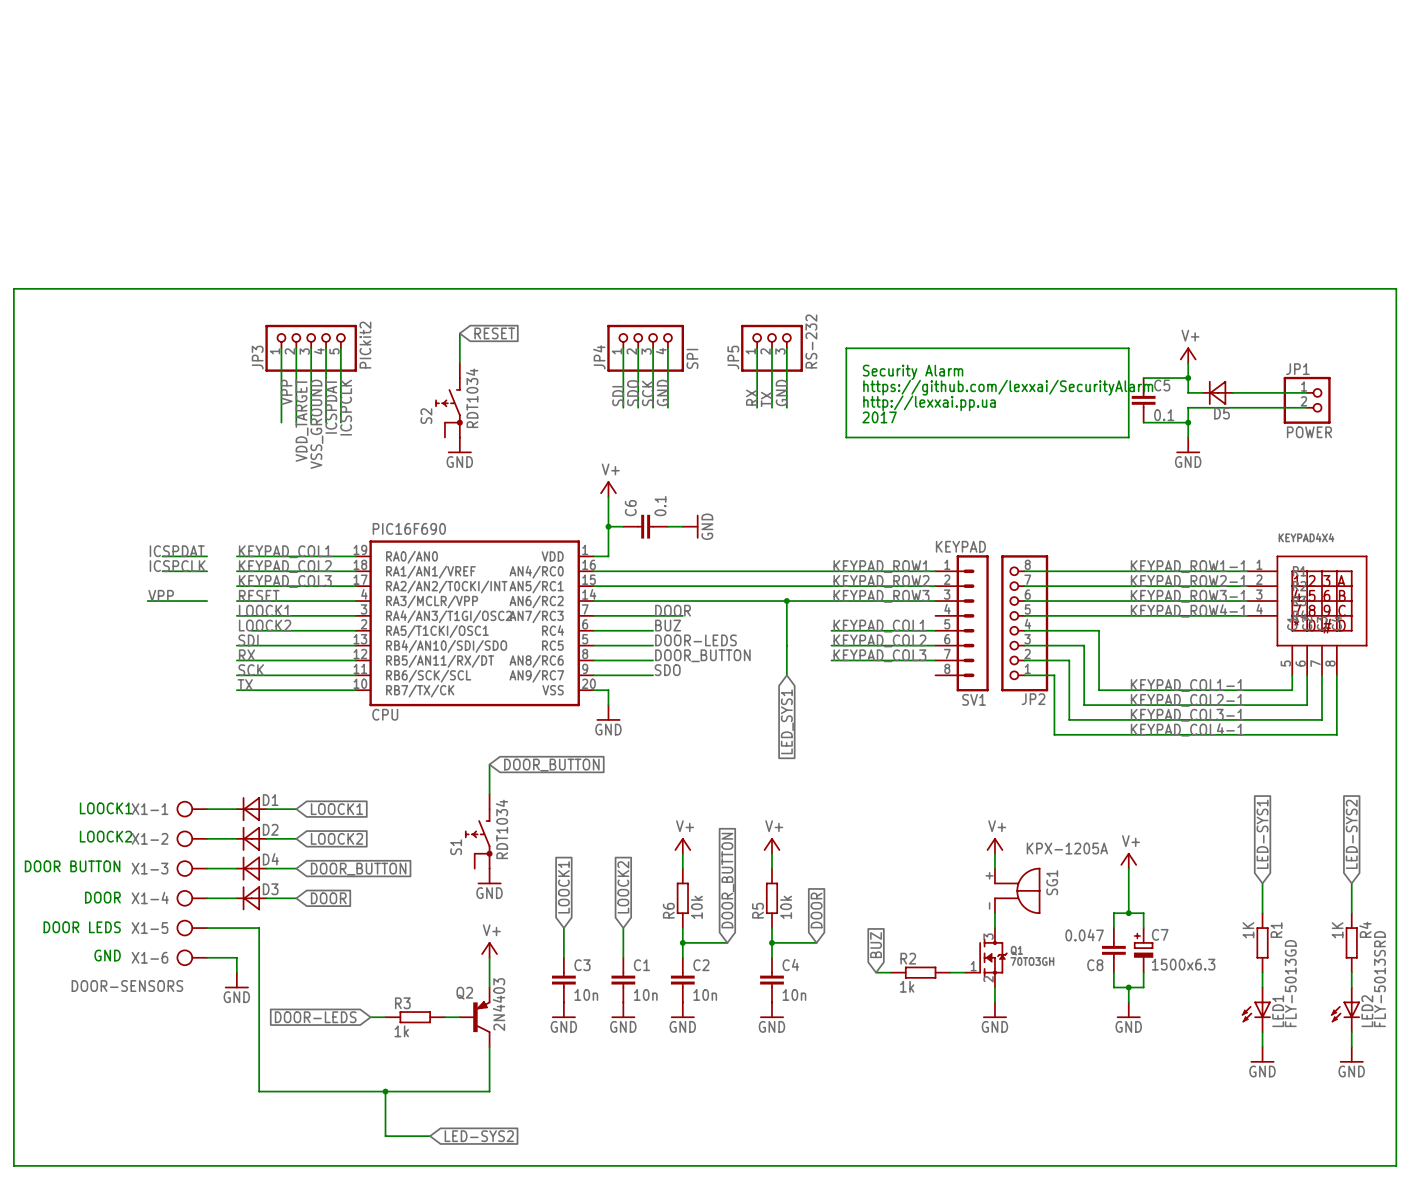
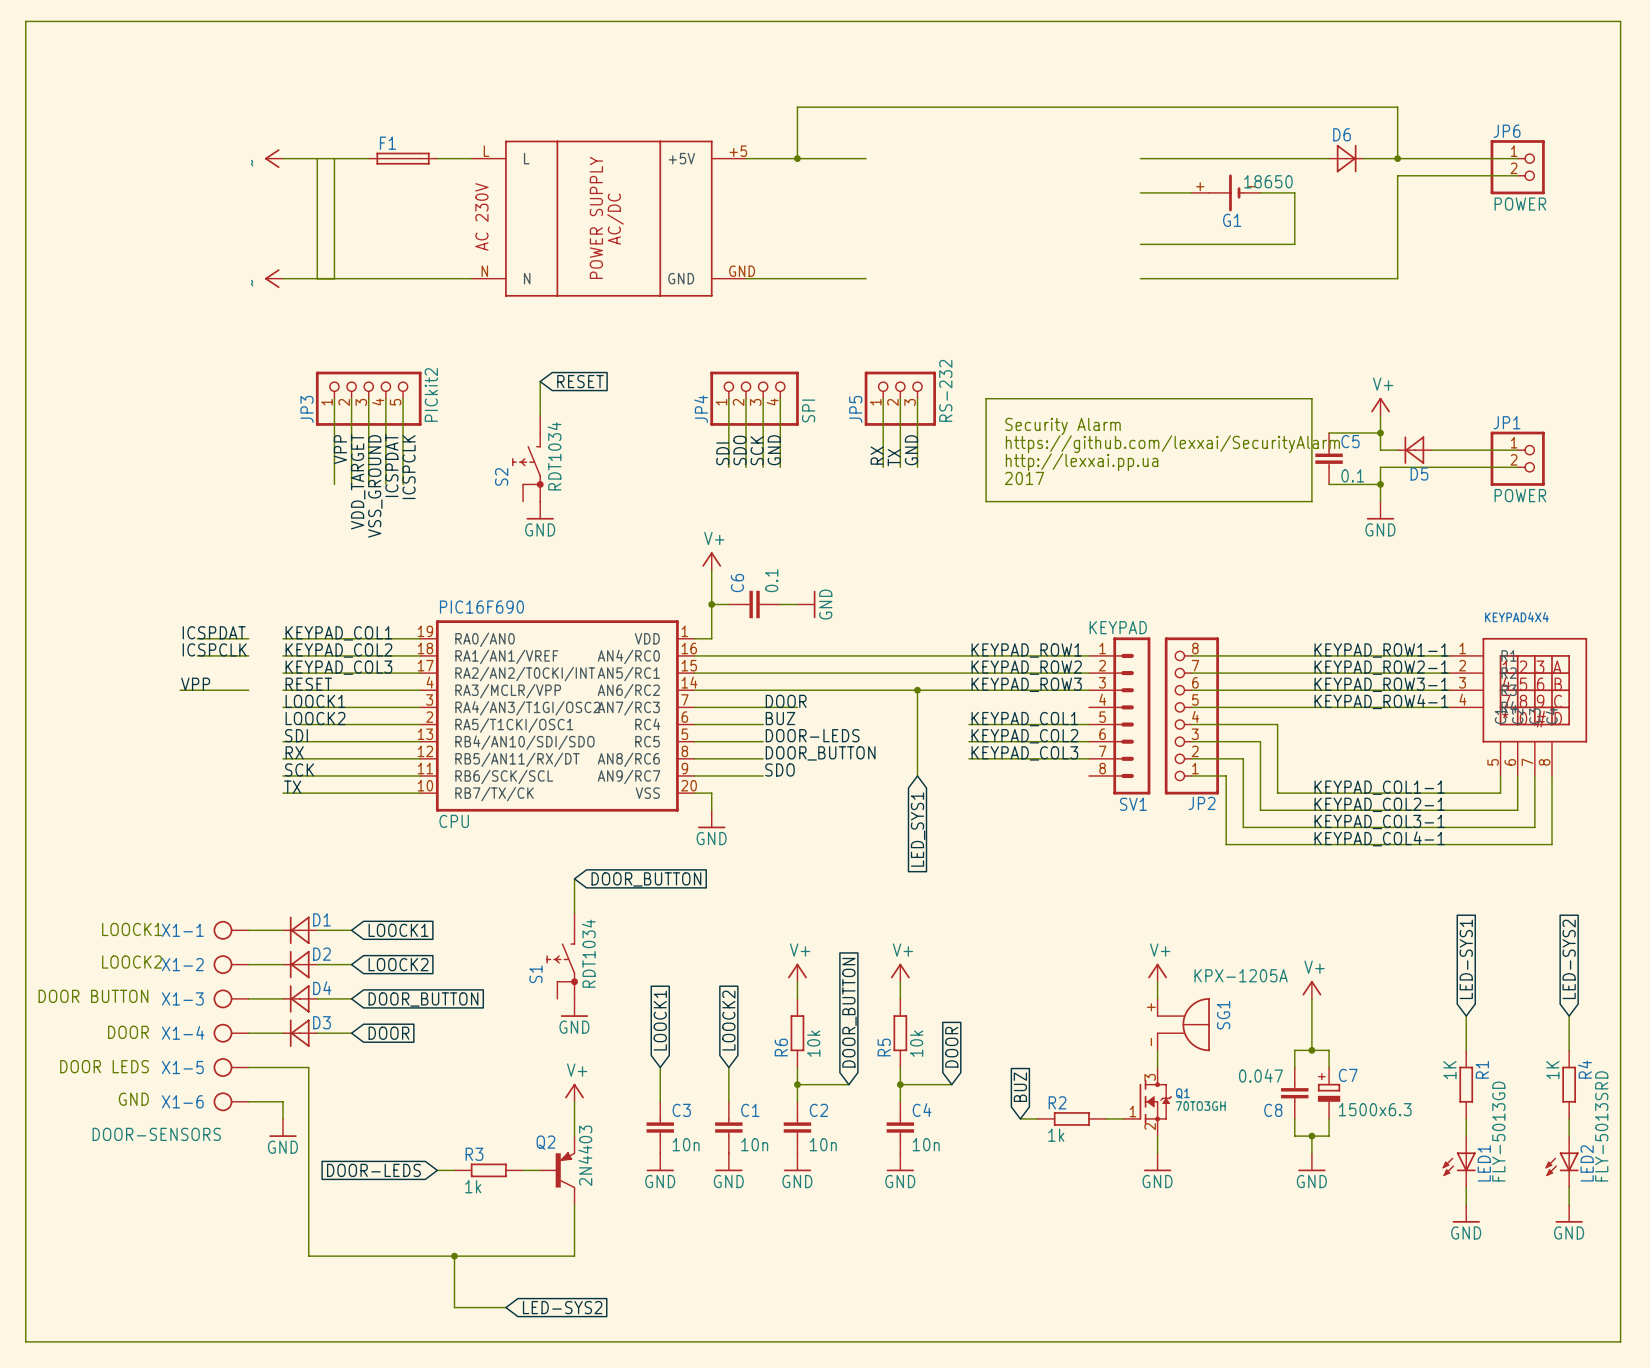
power symbol: none -> ~ (273, 158)
wire: none -> (282, 158) (368, 158)
wire: none -> (317, 158) (317, 278)
wire: none -> (334, 158) (334, 278)
F1: none -> (403, 158)
wire: none -> (437, 158) (471, 158)
wire: none -> (746, 158) (866, 158)
wire: none -> (797, 158) (797, 107) (1397, 107) (1397, 158)
junction: none -> (797, 158)
wire: none -> (1140, 158) (1329, 158)
D6: none -> (1346, 158)
wire: none -> (1363, 158) (1517, 158)
junction: none -> (1397, 158)
JP6: none -> POWER (1517, 167)
wire: none -> (1517, 175) (1397, 175) (1397, 278) (1140, 278)
wire: none -> (1140, 192) (1191, 192)
G1: none -> 18650 (1226, 192)
wire: none -> (1260, 192) (1294, 192) (1294, 244) (1140, 244)
part: none -> (608, 218)
power symbol: none -> ~ (273, 278)
wire: none -> (282, 278) (471, 278)
wire: none -> (746, 278) (866, 278)
wire: (13, 288) (1396, 288) -> (25, 330) (25, 21) (1620, 21) (1620, 330)

